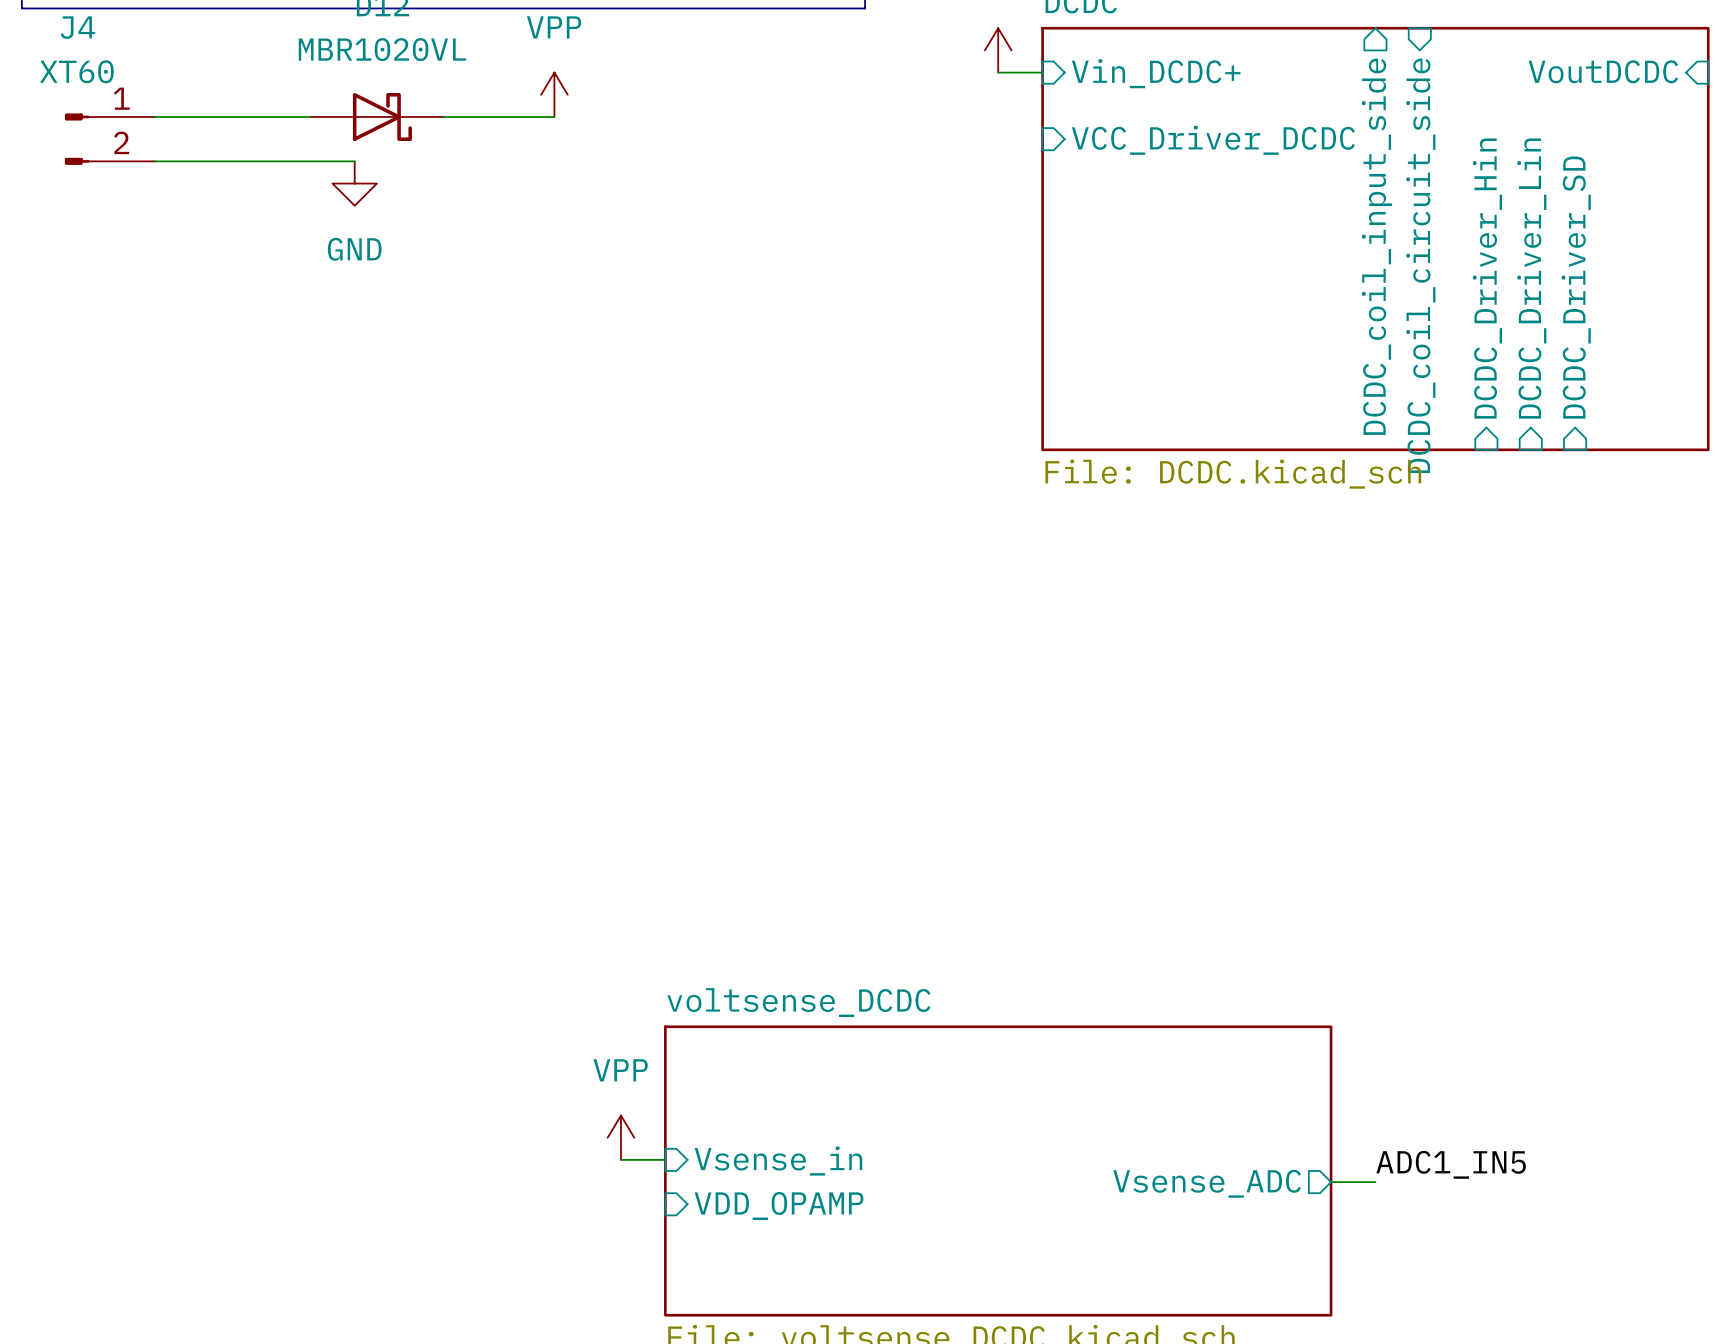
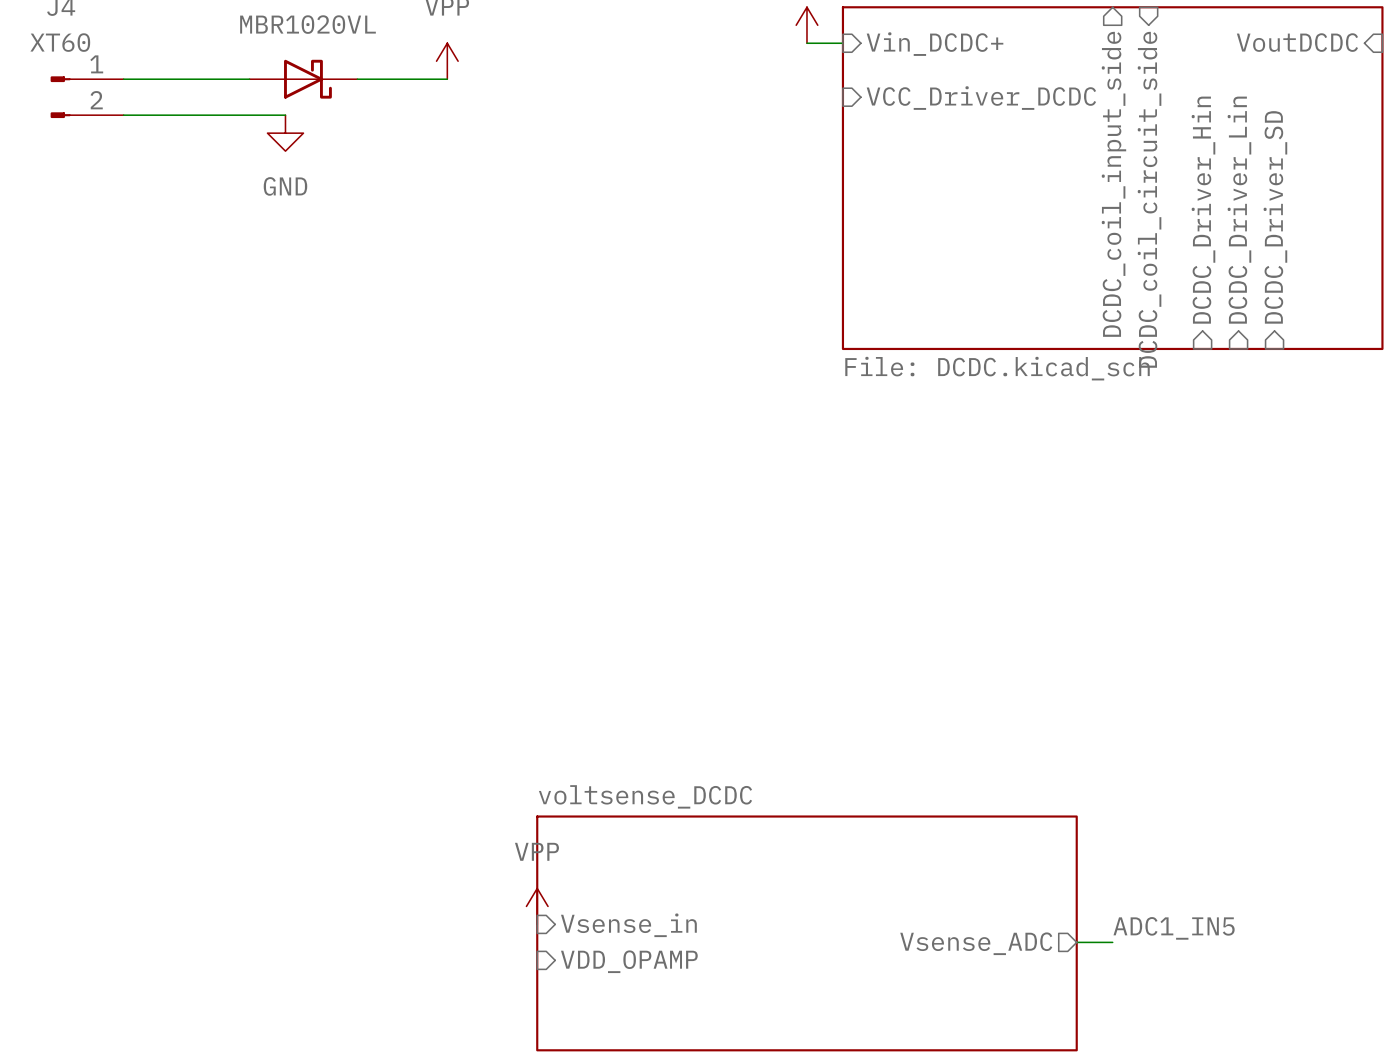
power symbol position: VPP (620, 1137) -> VPP (537, 906)
wire: (620, 1159) (665, 1159) -> none

